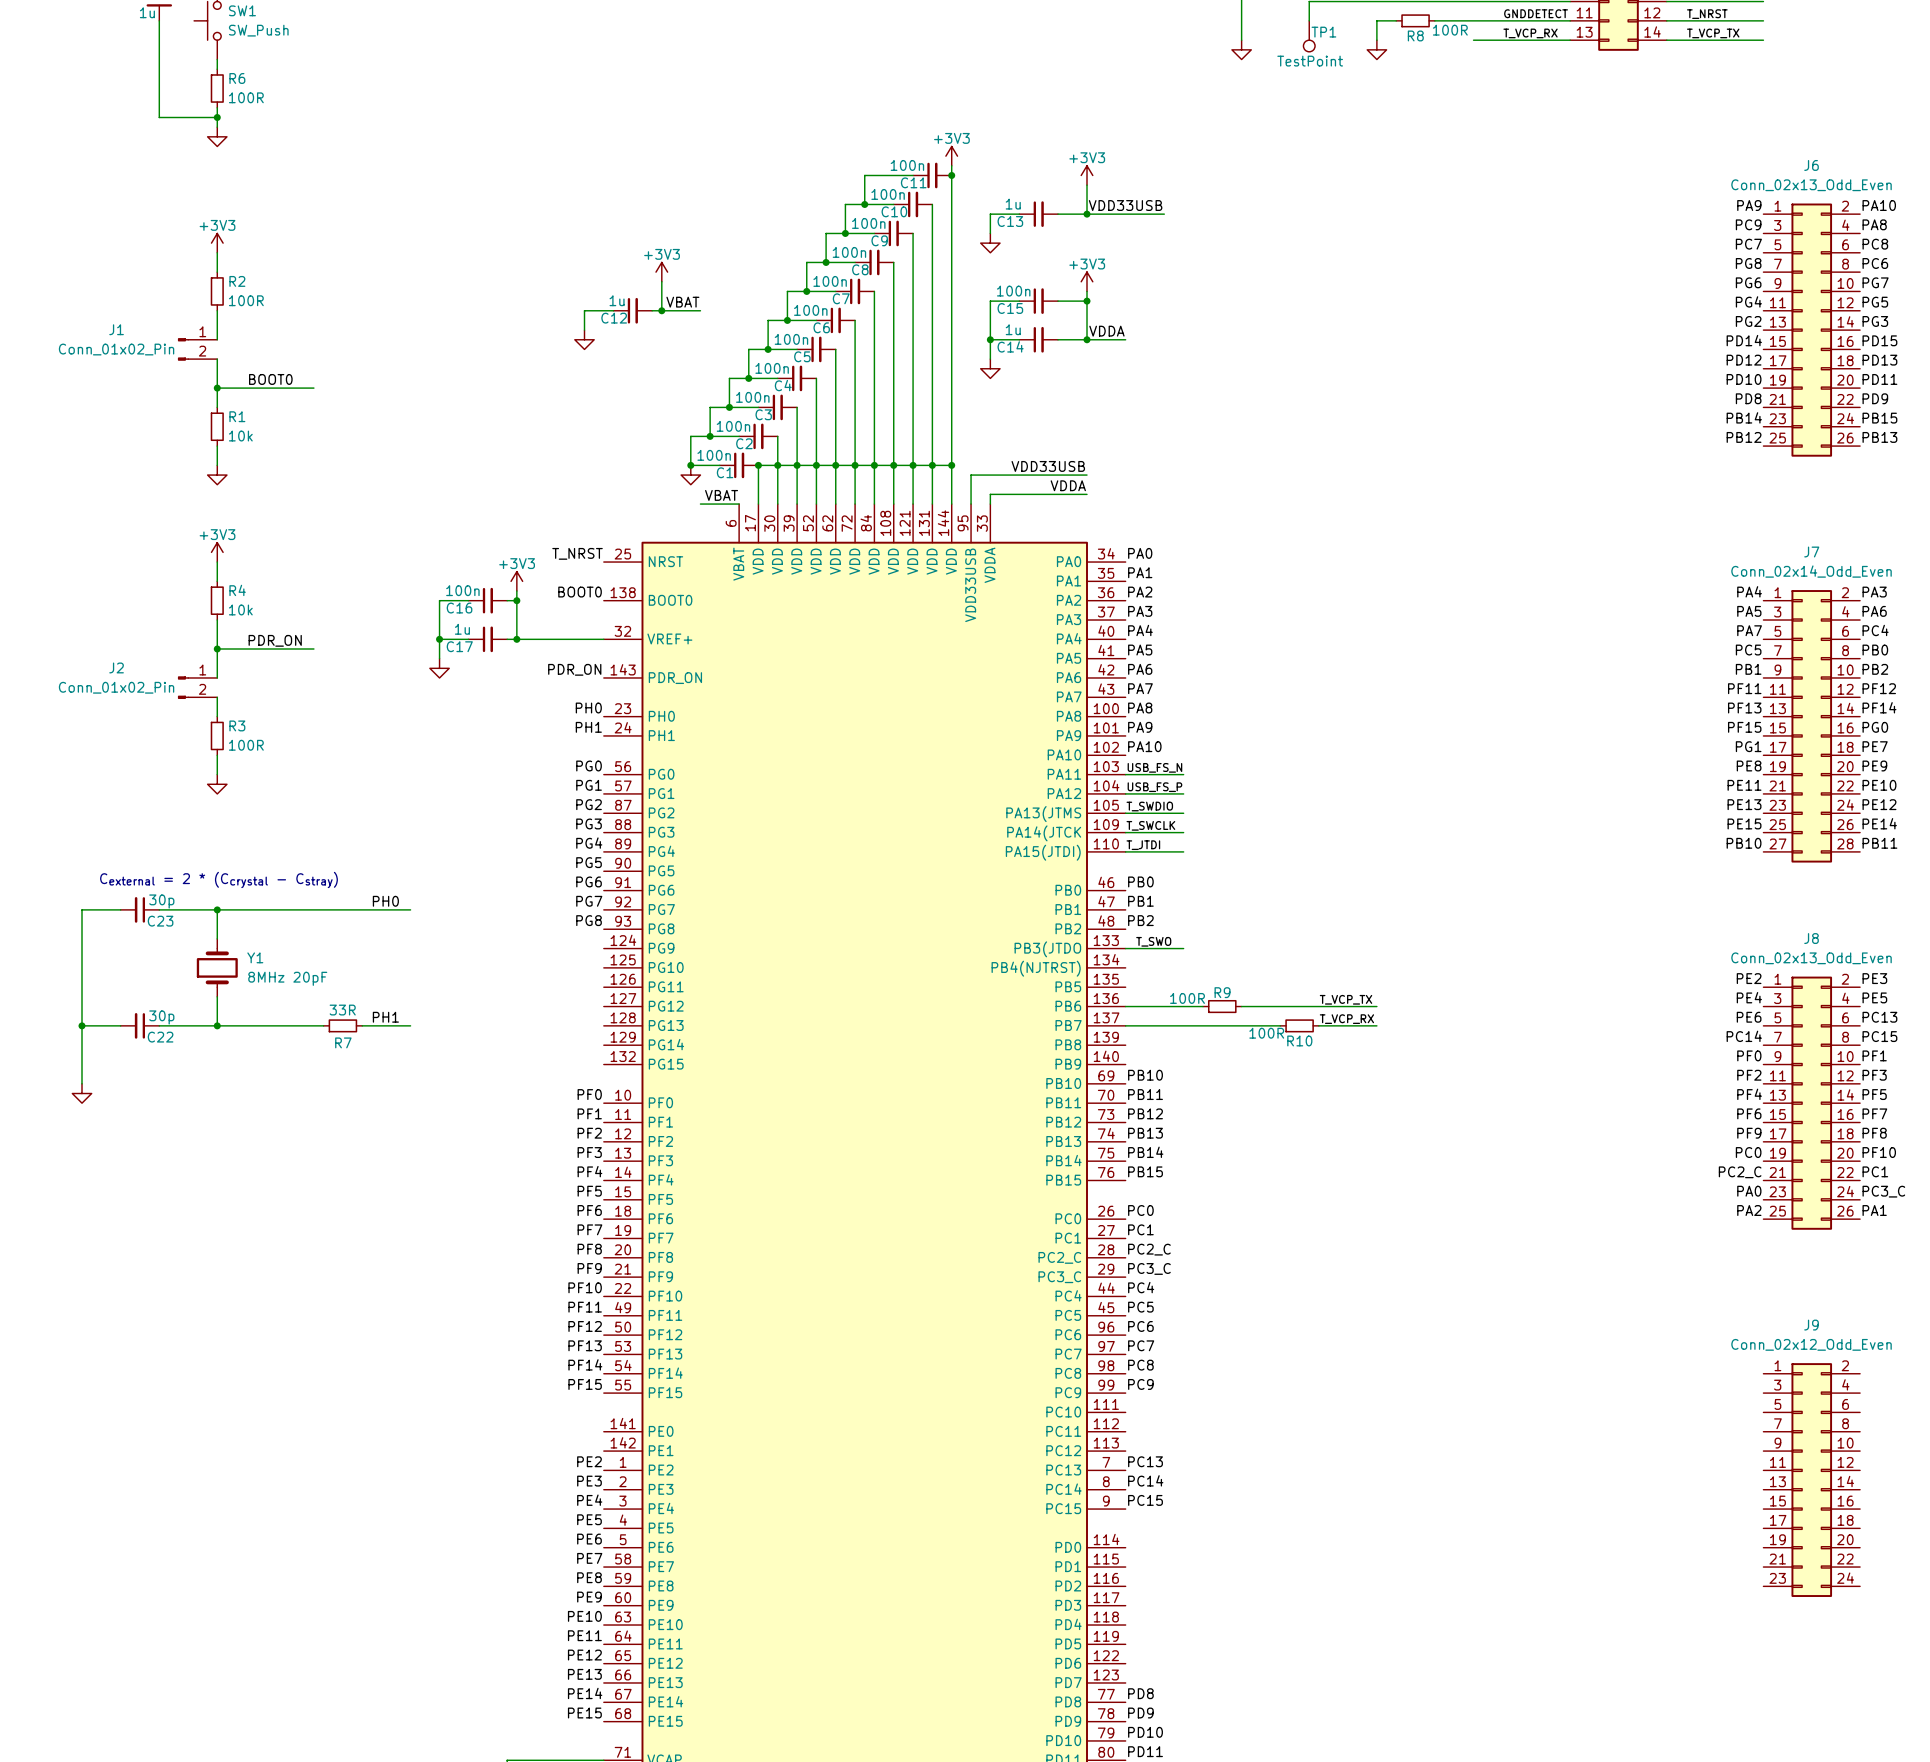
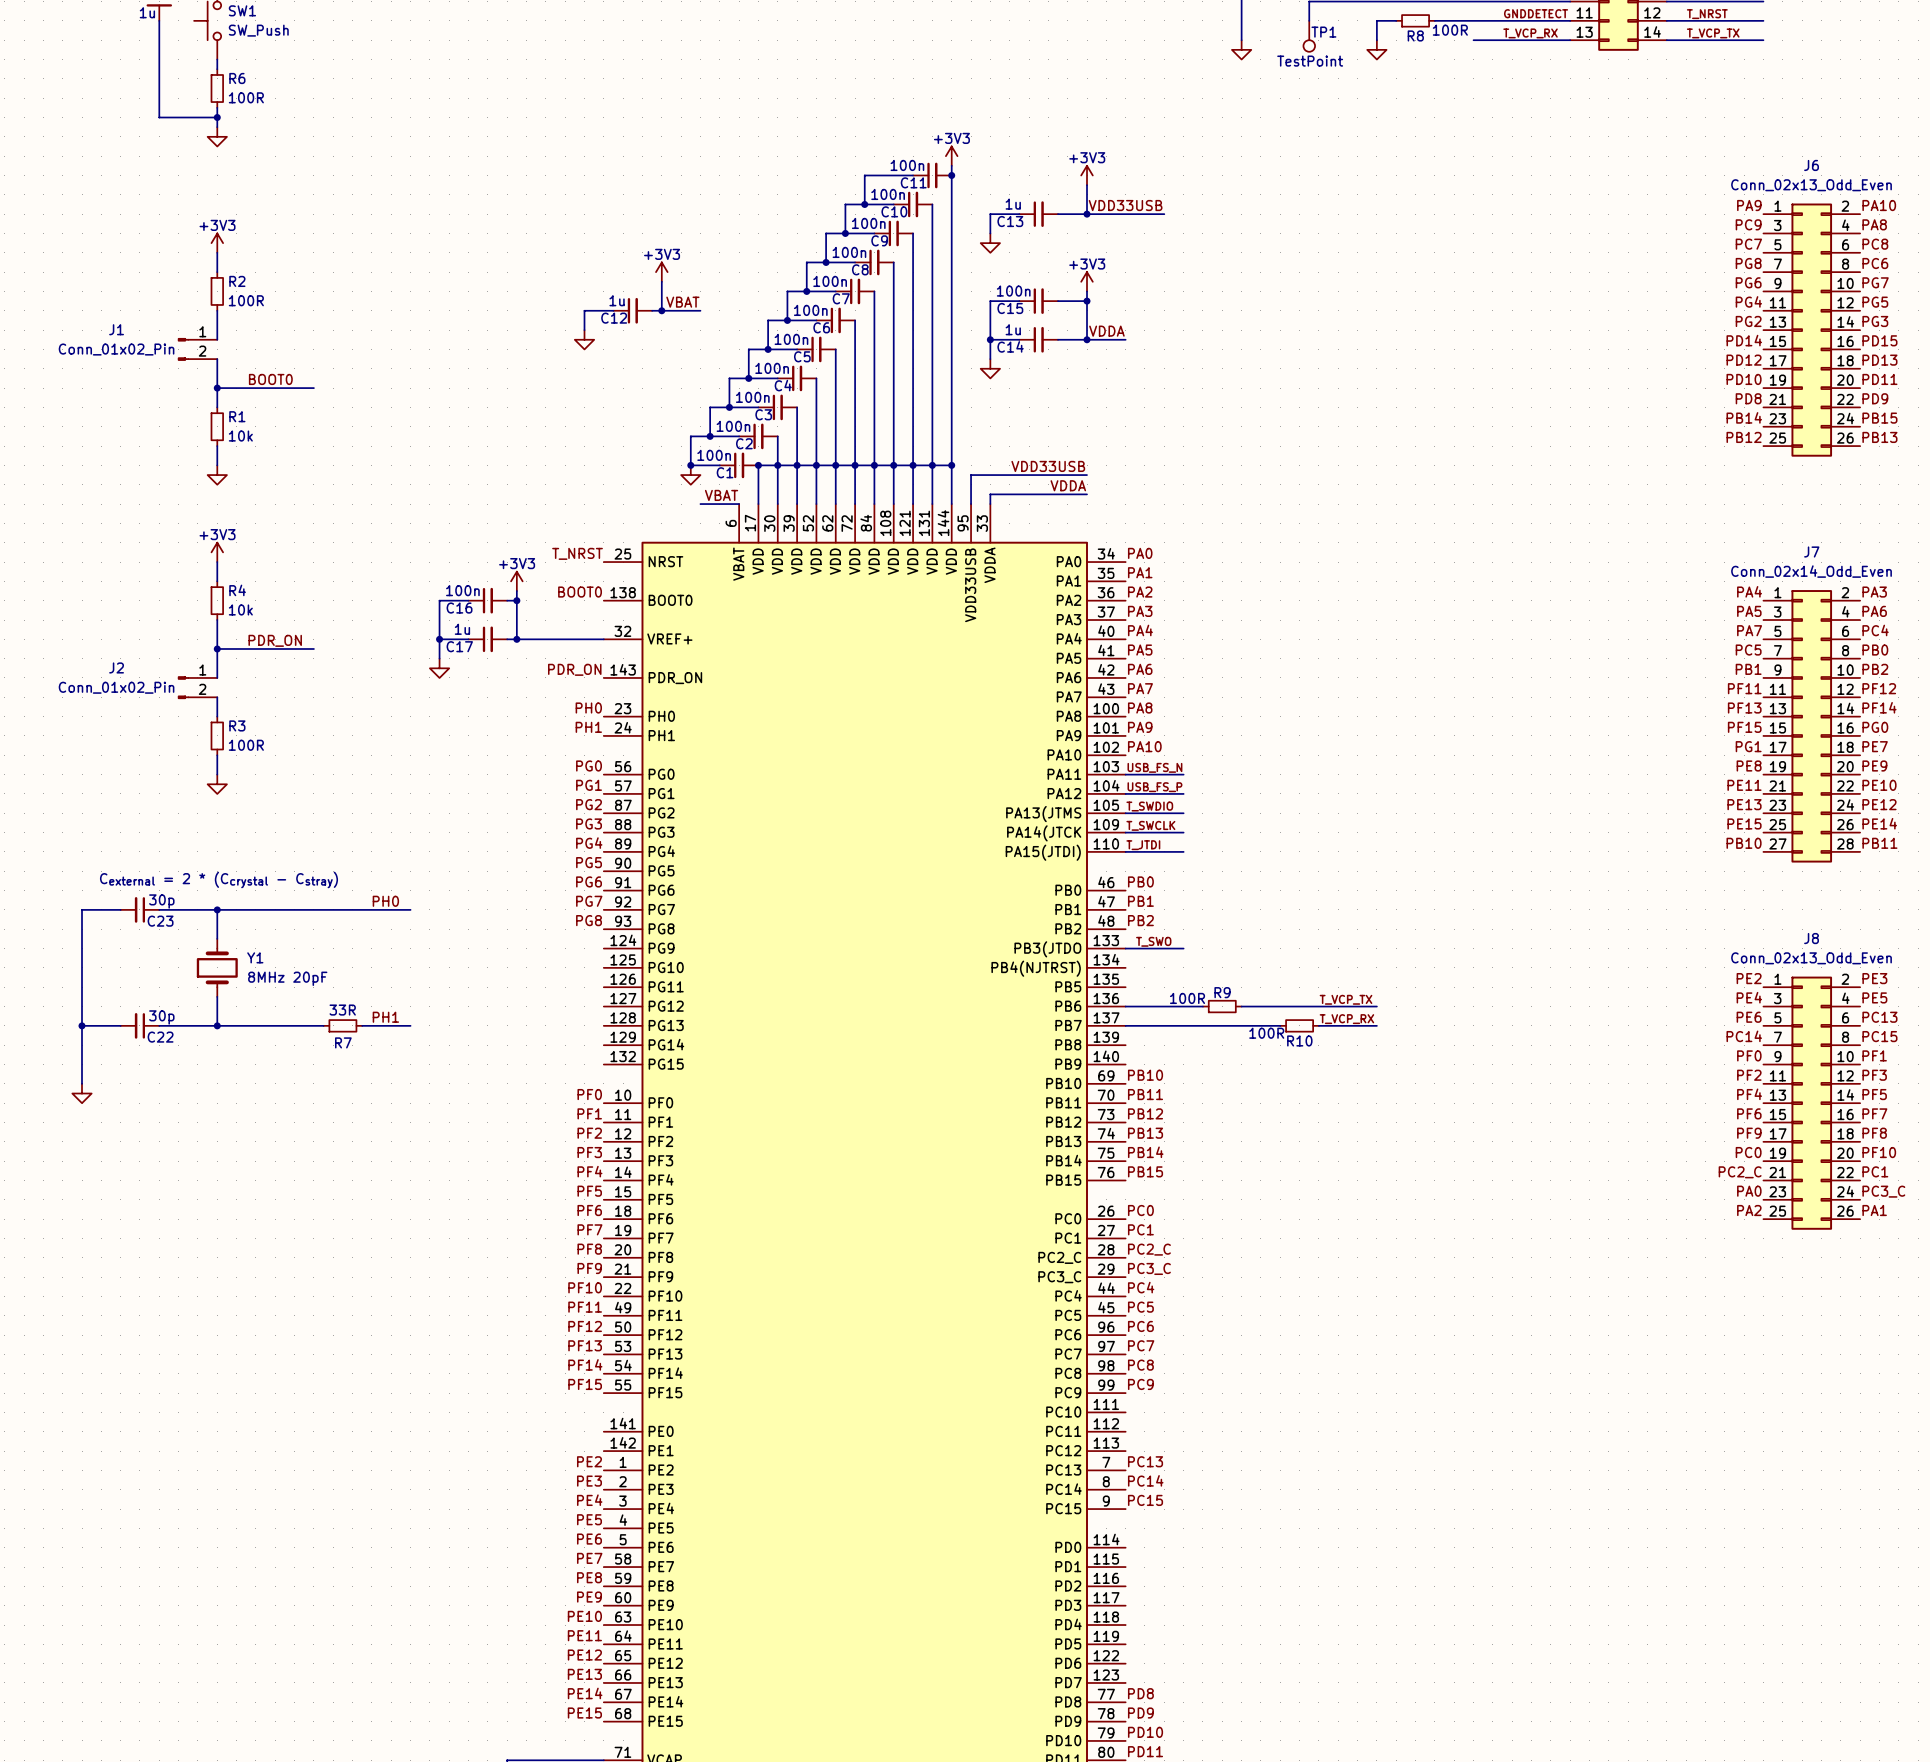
J9: Conn_02x12_Odd_Even (1811, 1480) -> none

